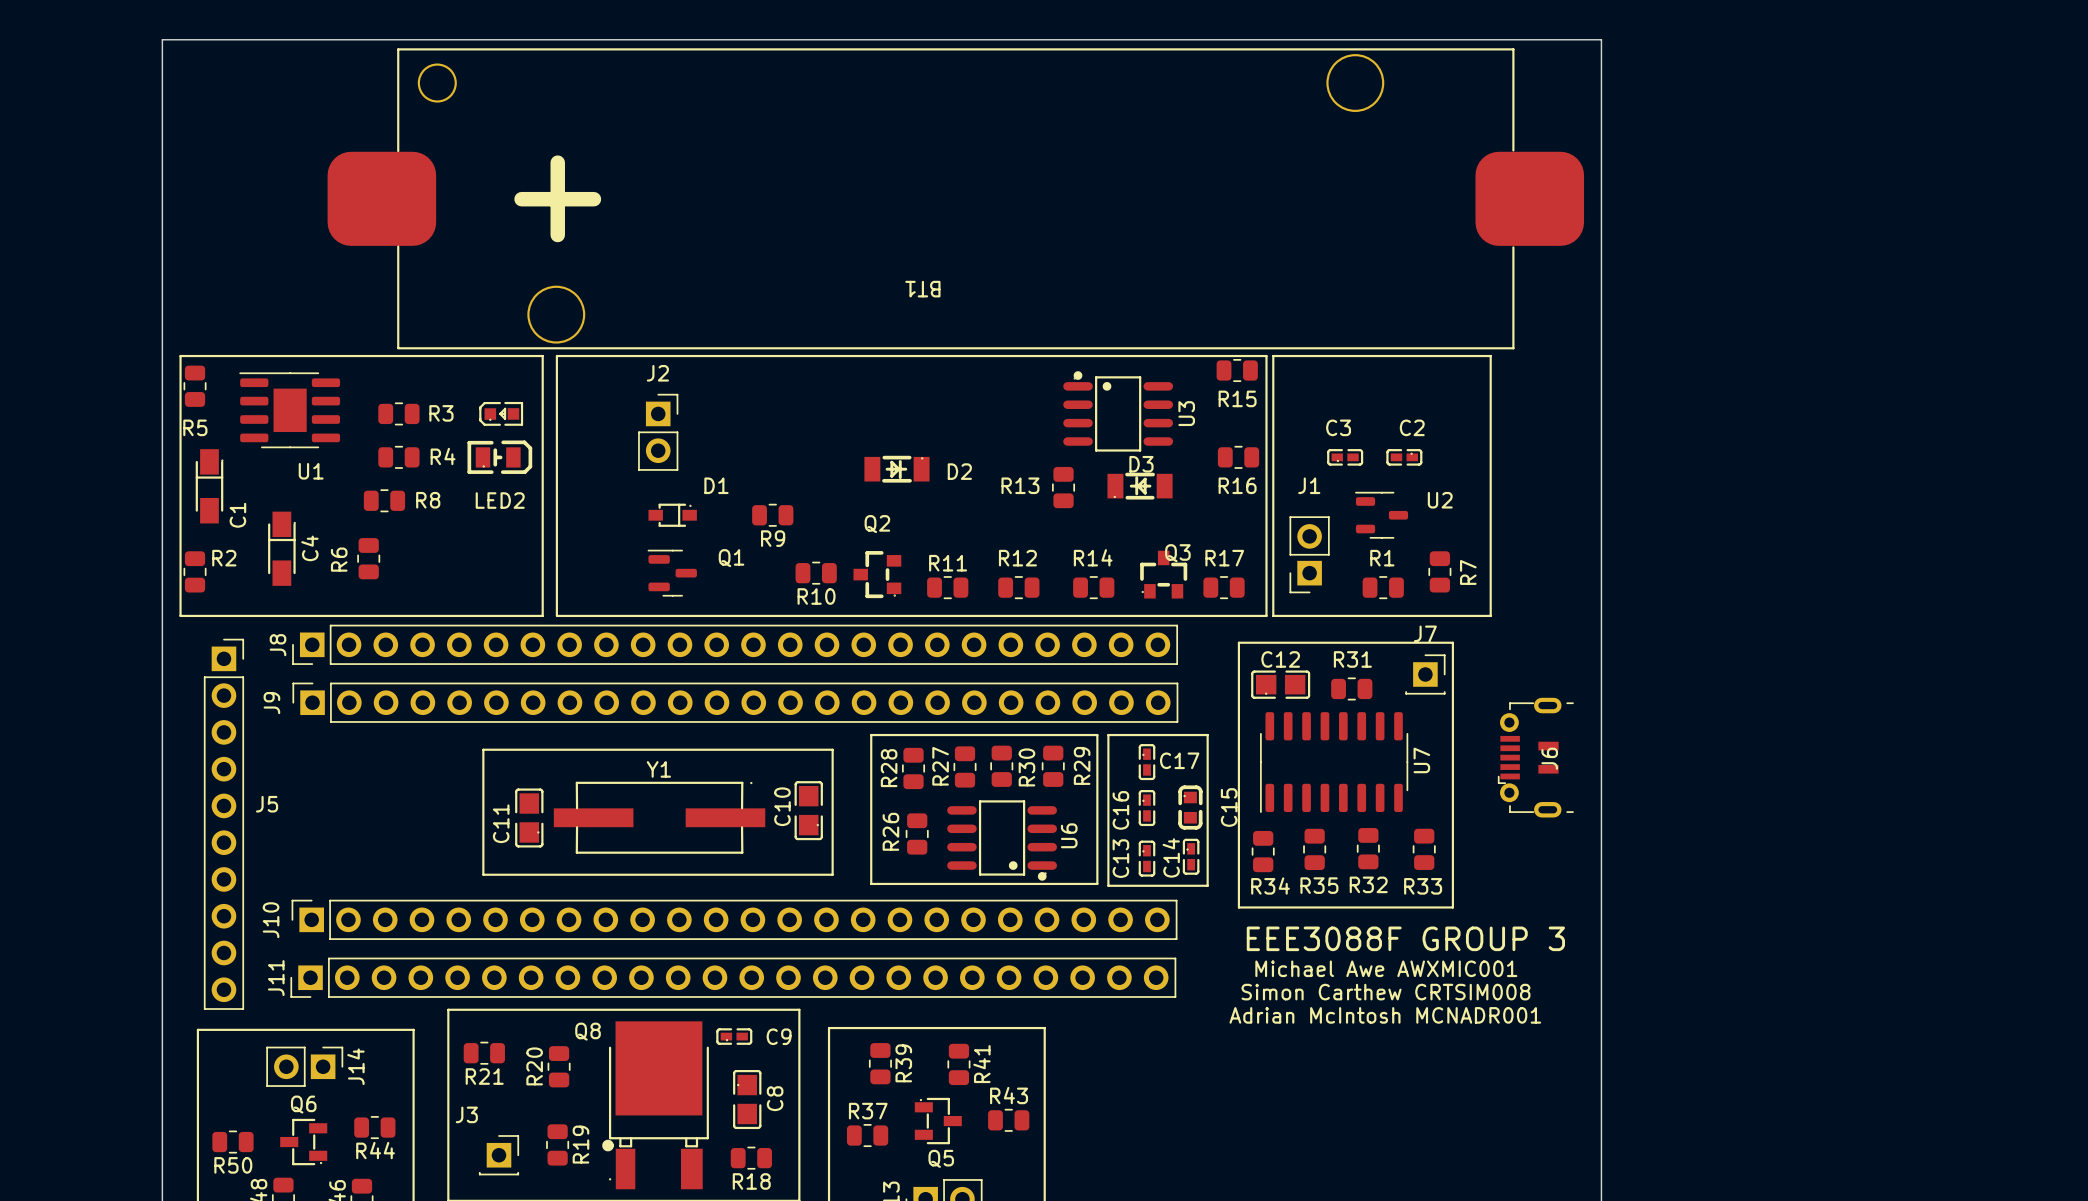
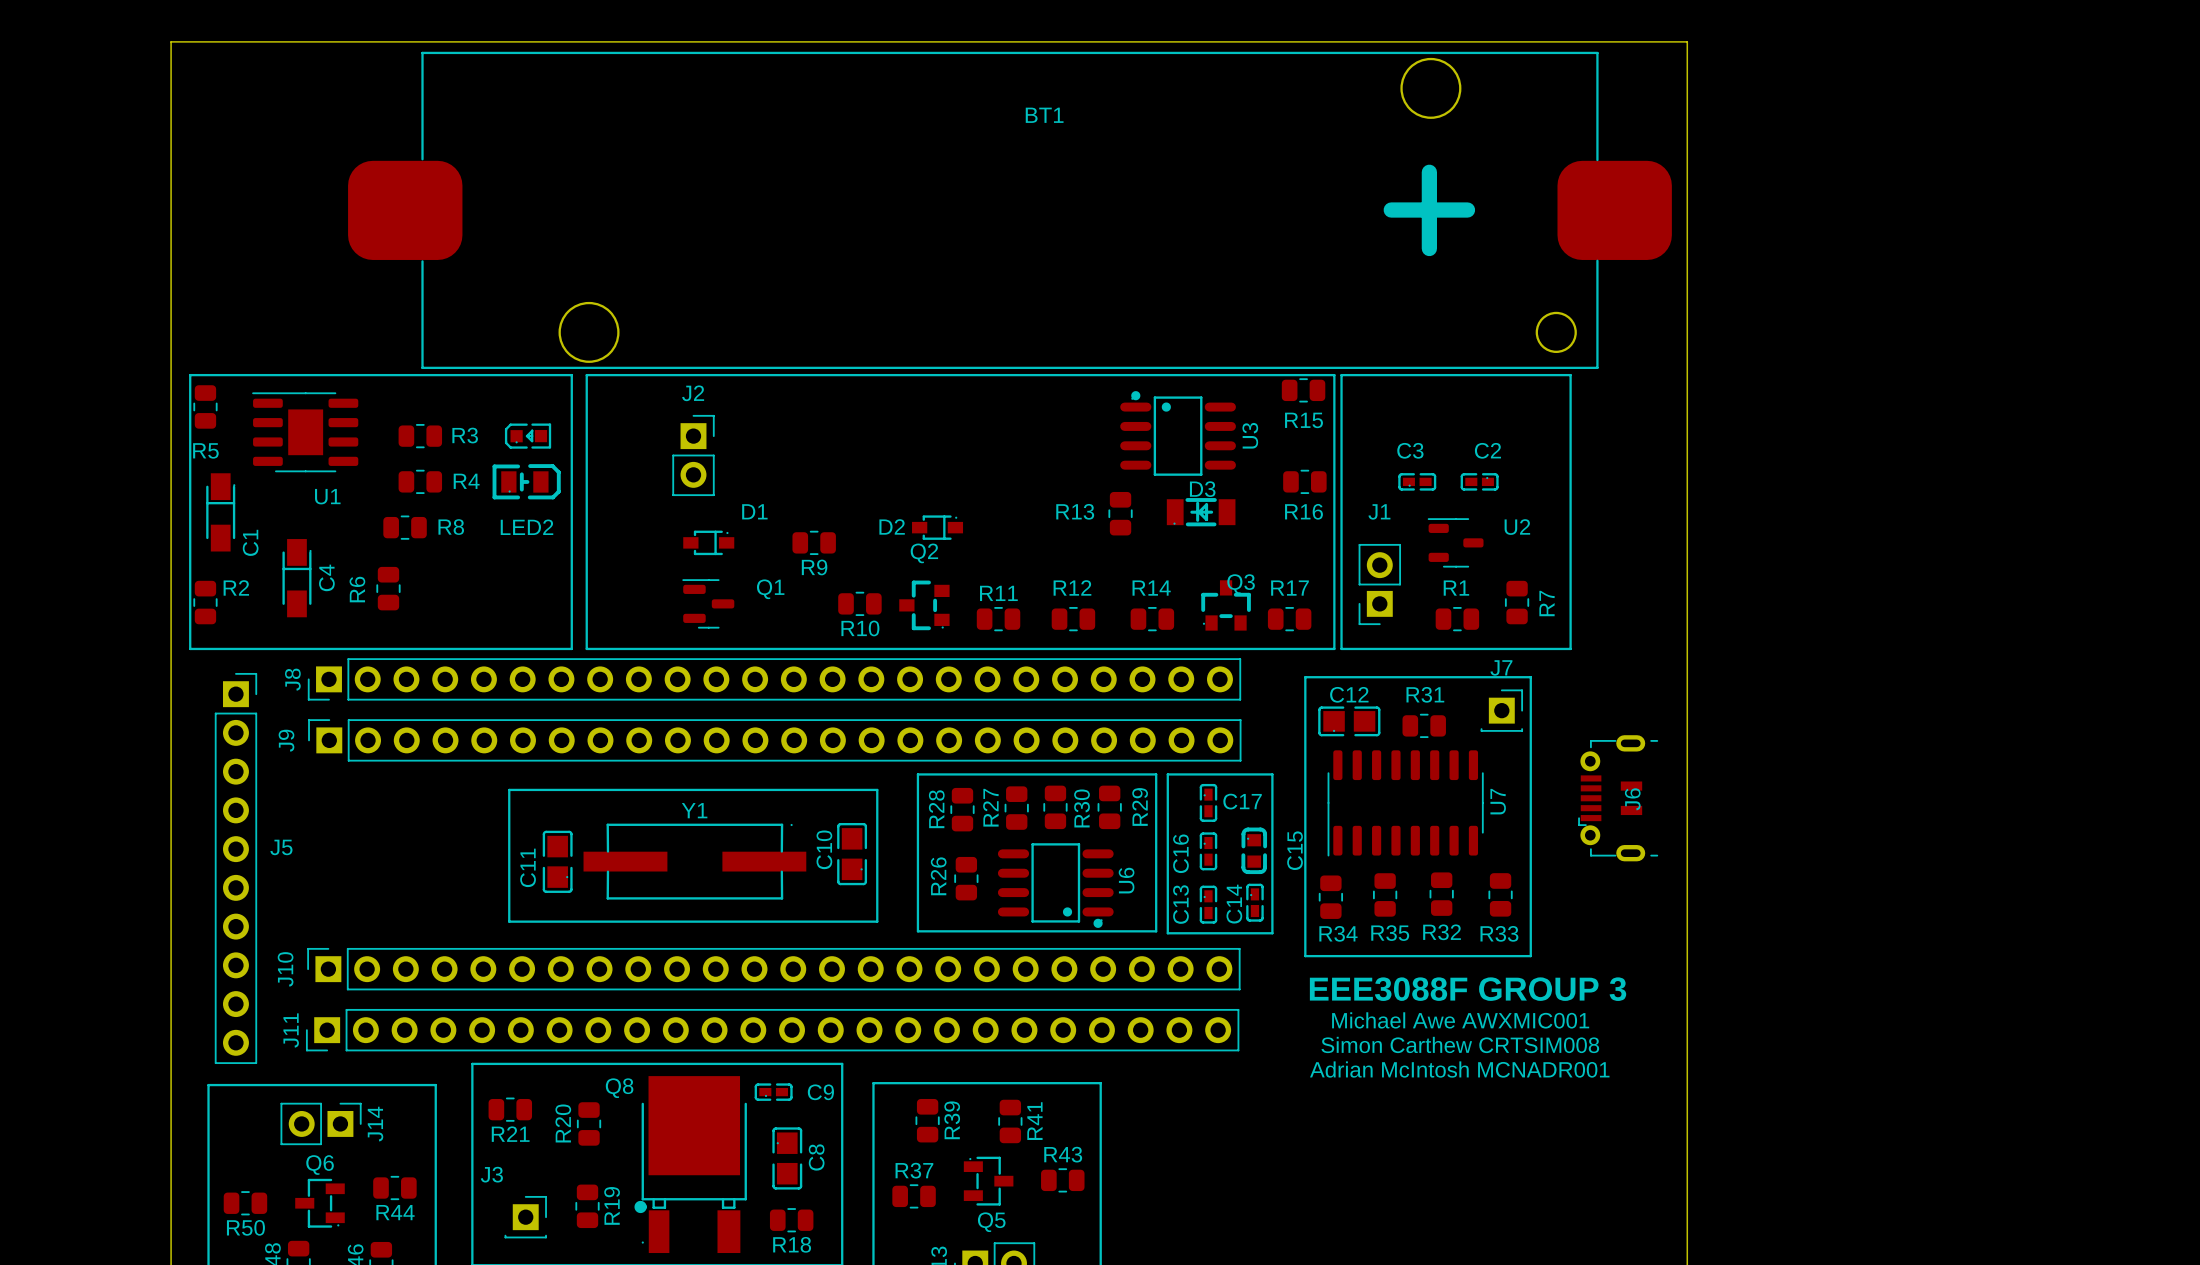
BT1 rotation: 0° (955, 198) -> 180° (1009, 210)
D2 footprint: [864, 455, 930, 483] -> [912, 515, 964, 540]
D2 name position: D2 (959, 471) -> D2 (892, 526)

